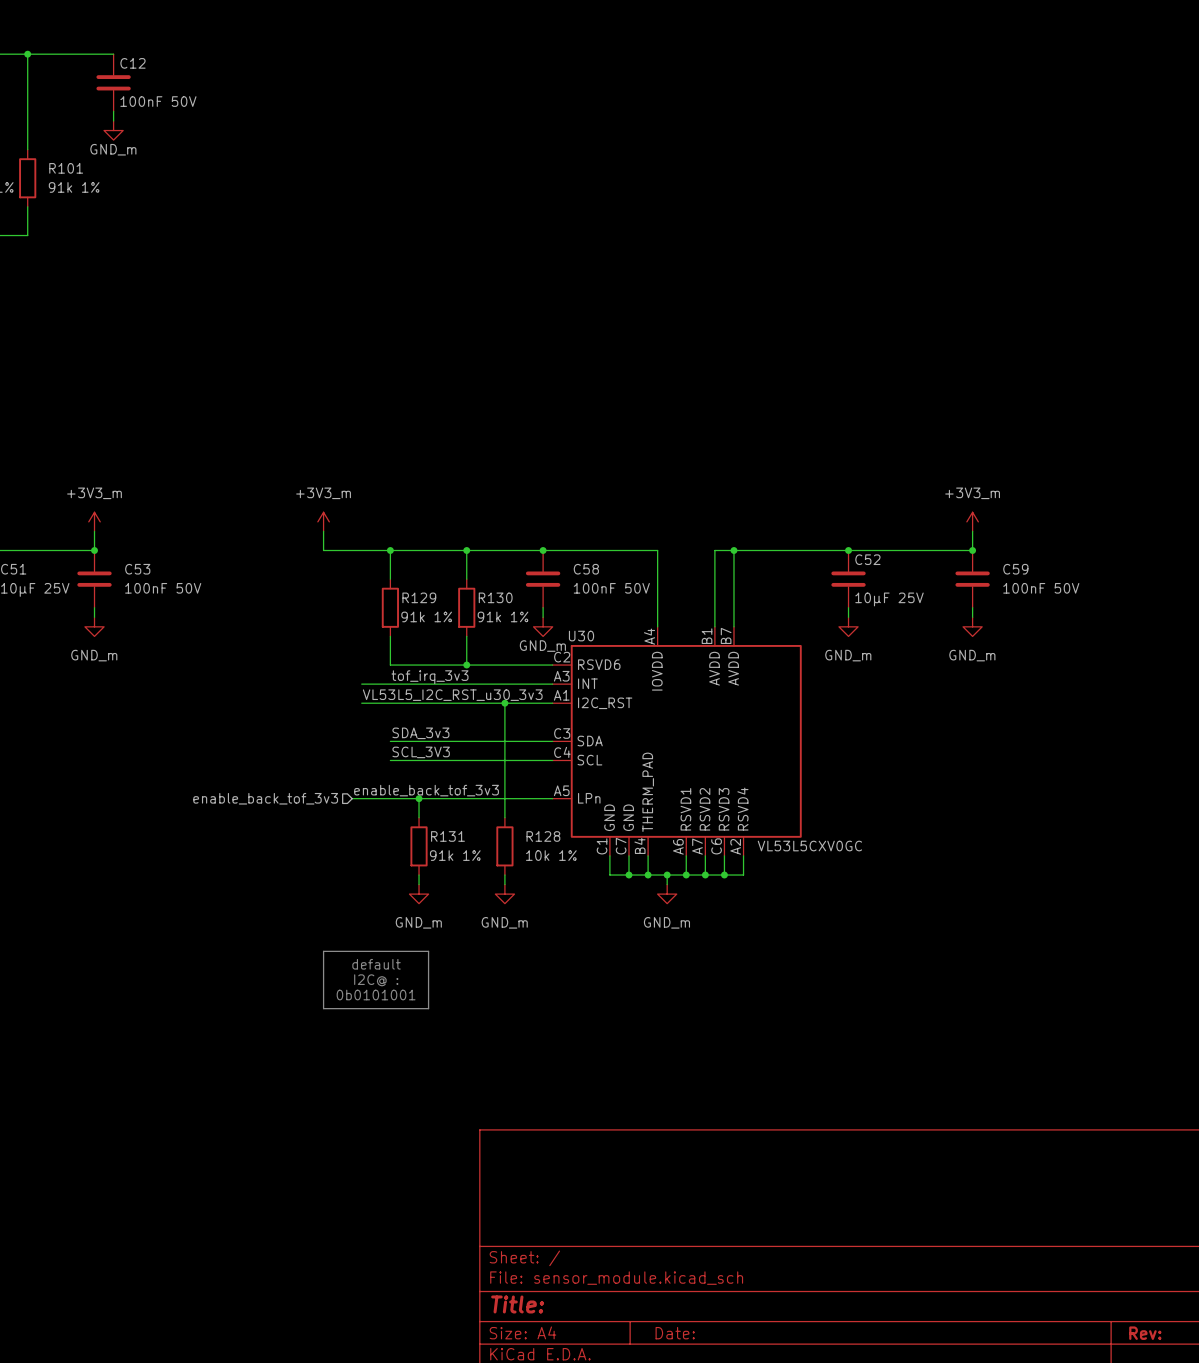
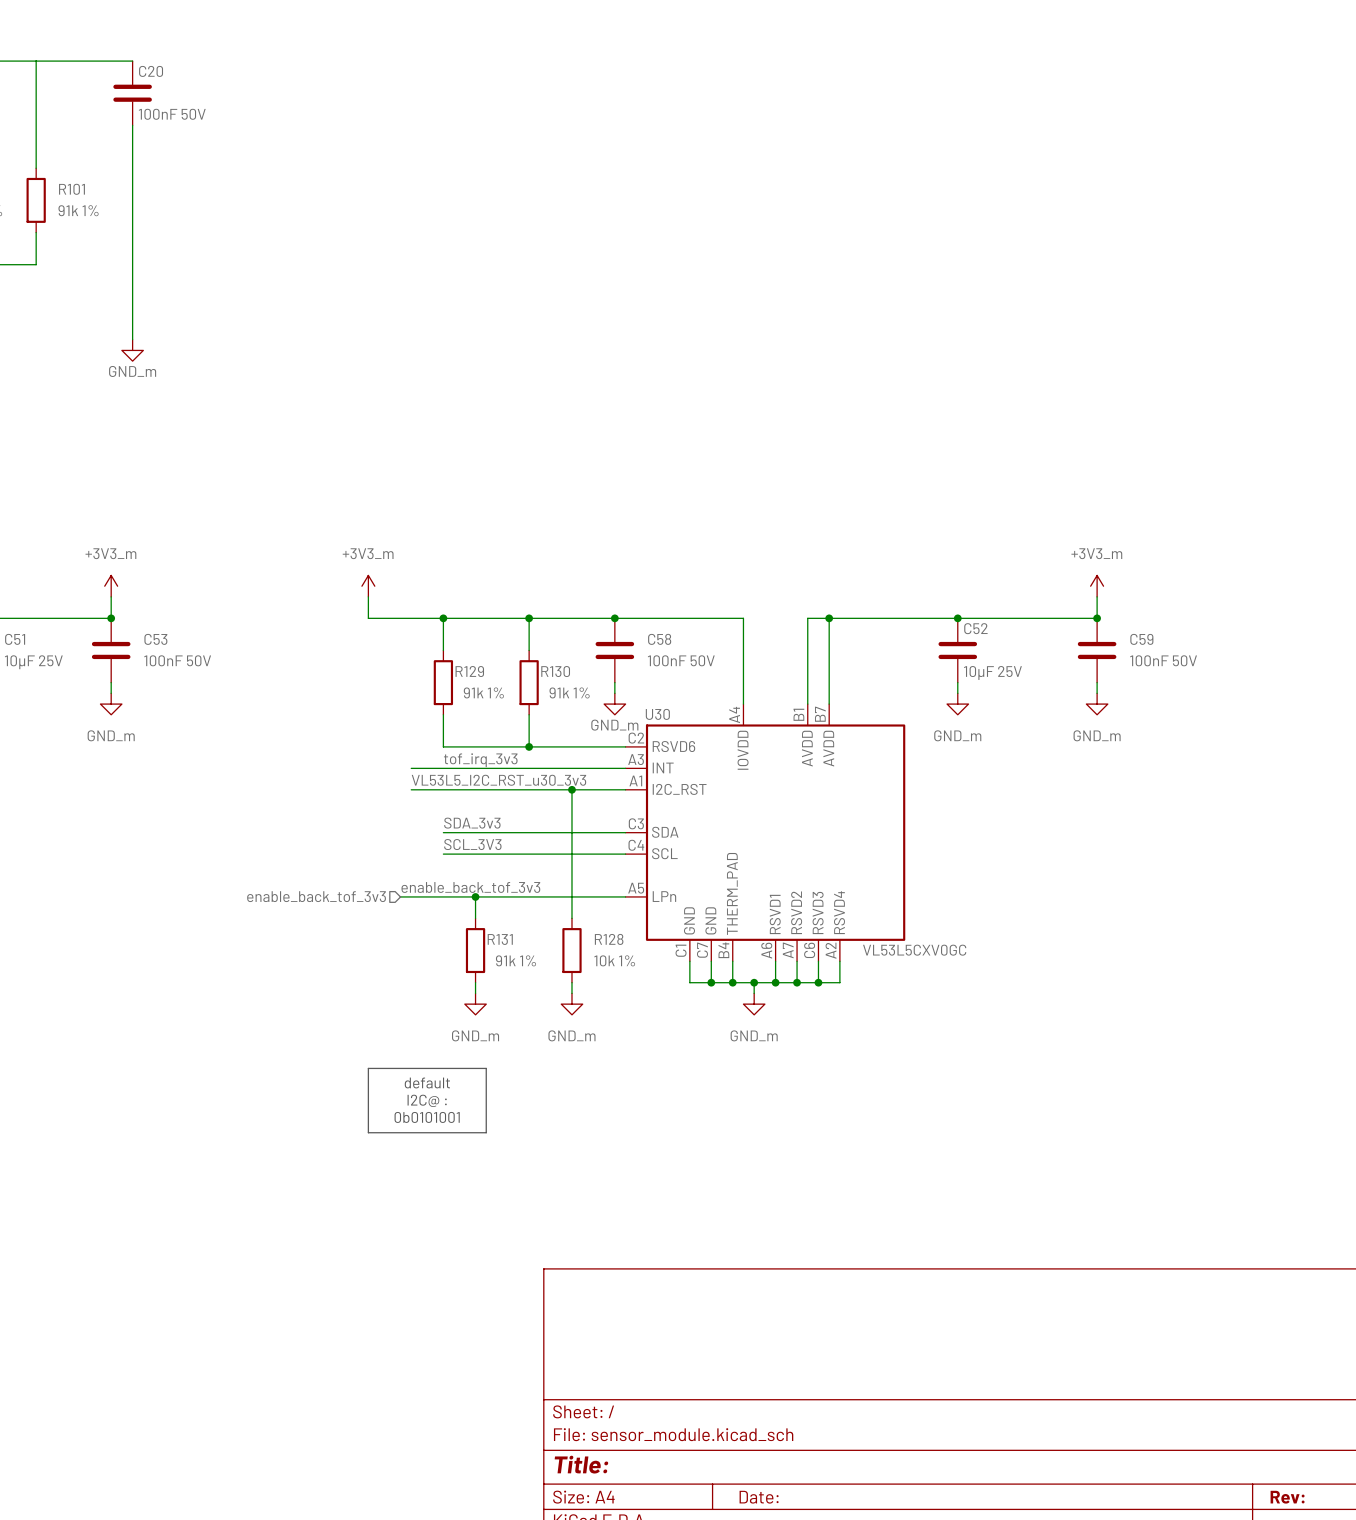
junction: (27, 54) -> none
C12 name: C12 (132, 63) -> C20 (151, 71)
wire: none -> (132, 136) (132, 339)
power symbol position: GND_m (113, 130) -> GND_m (132, 350)

